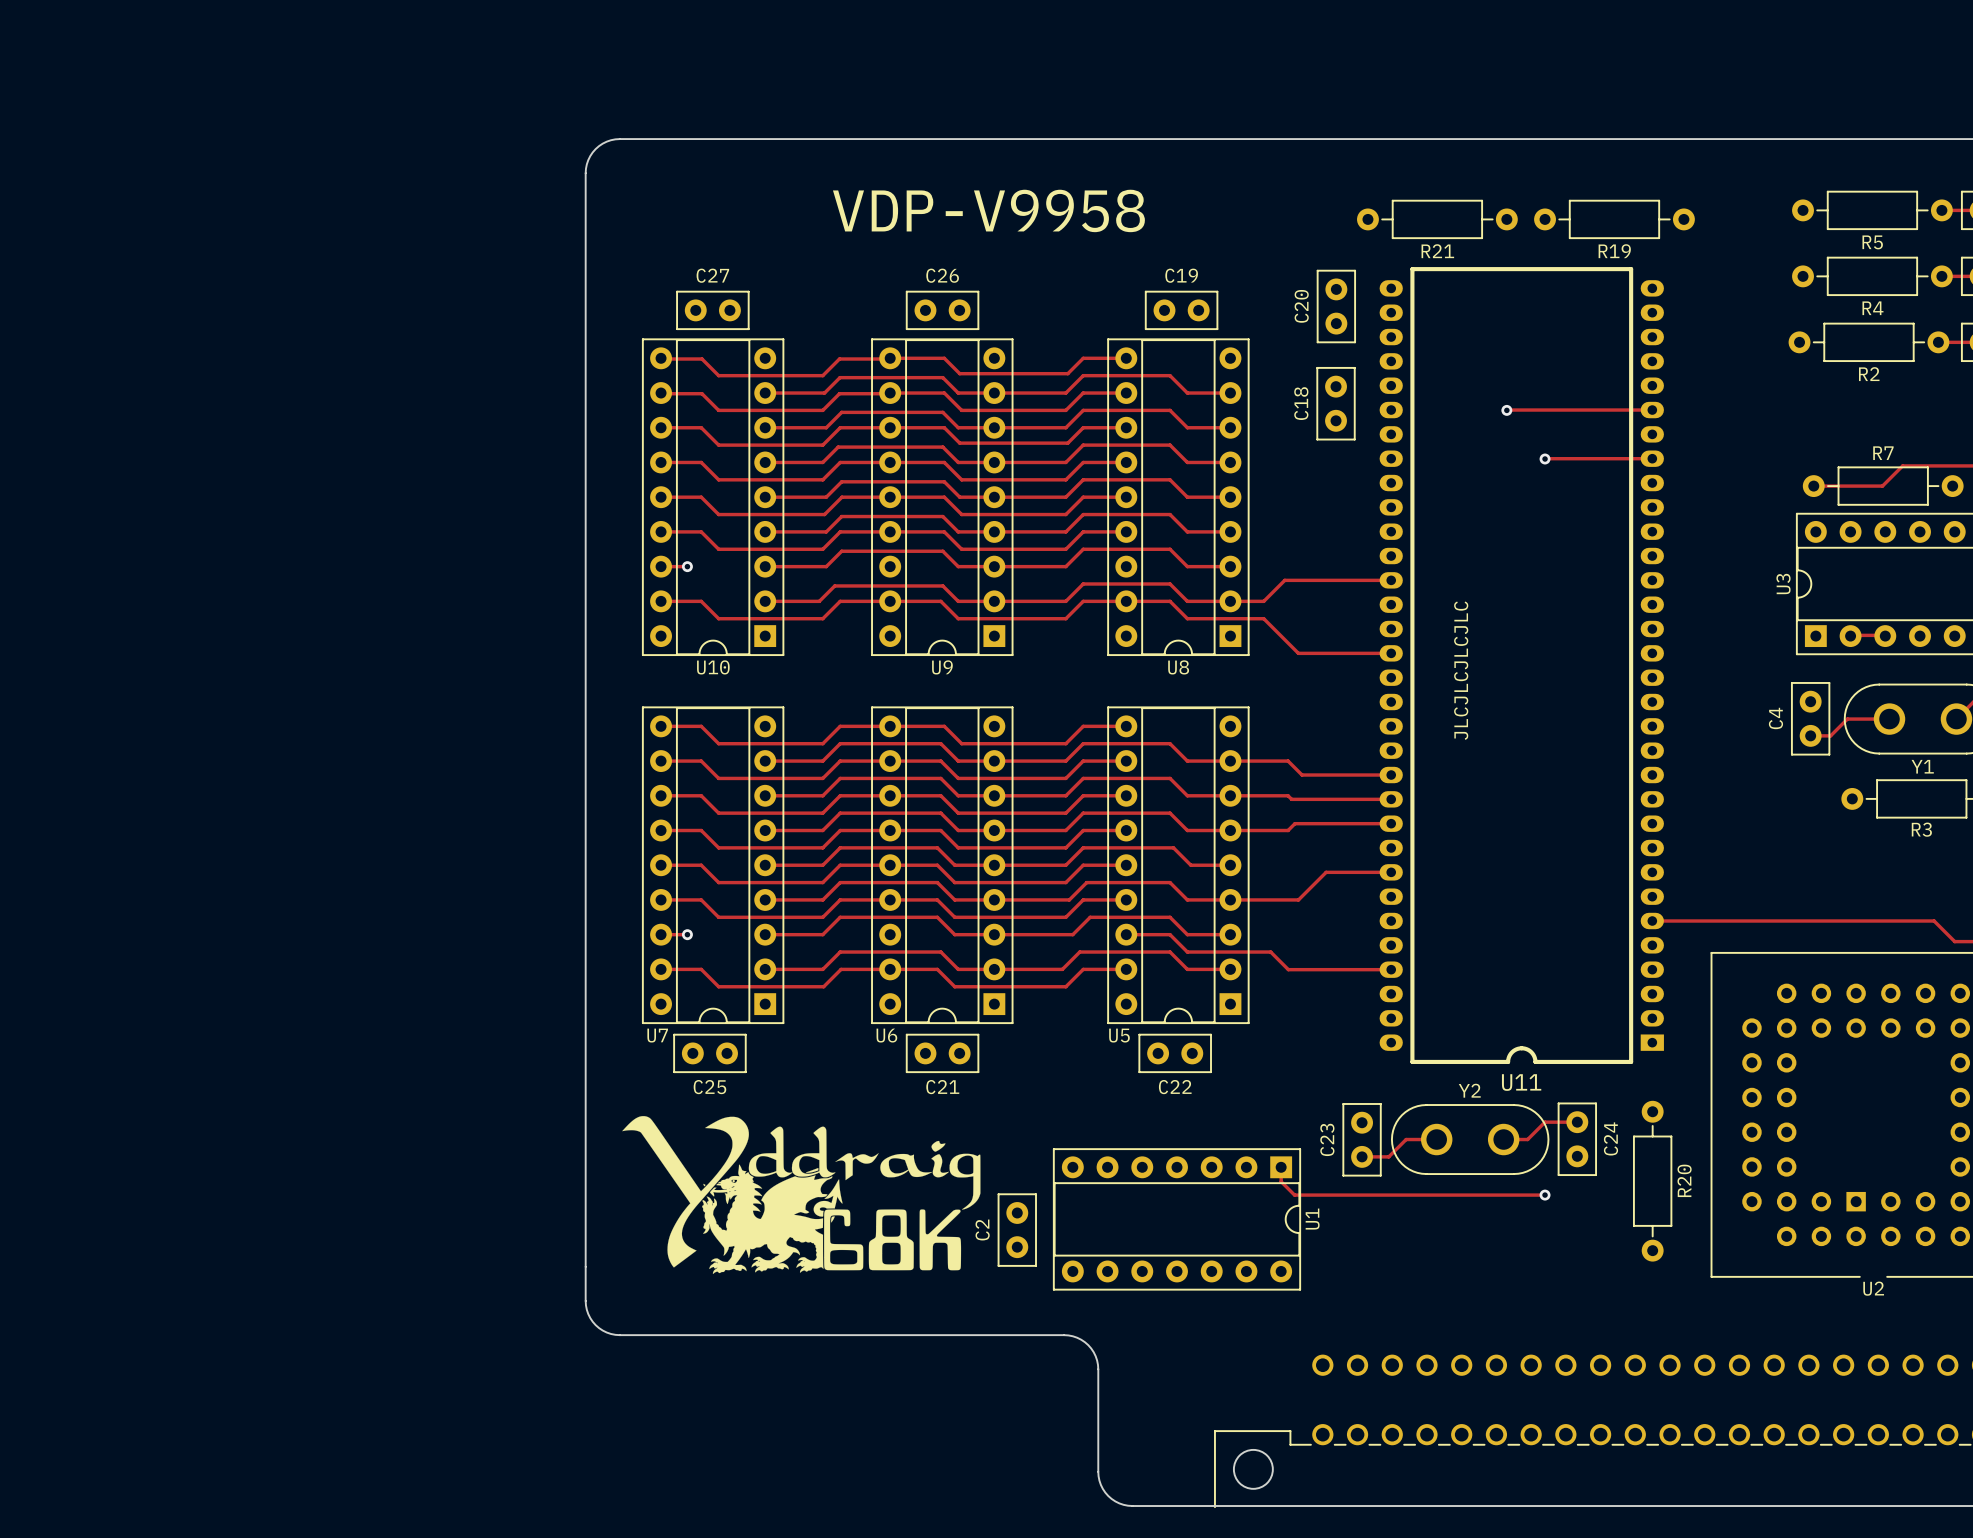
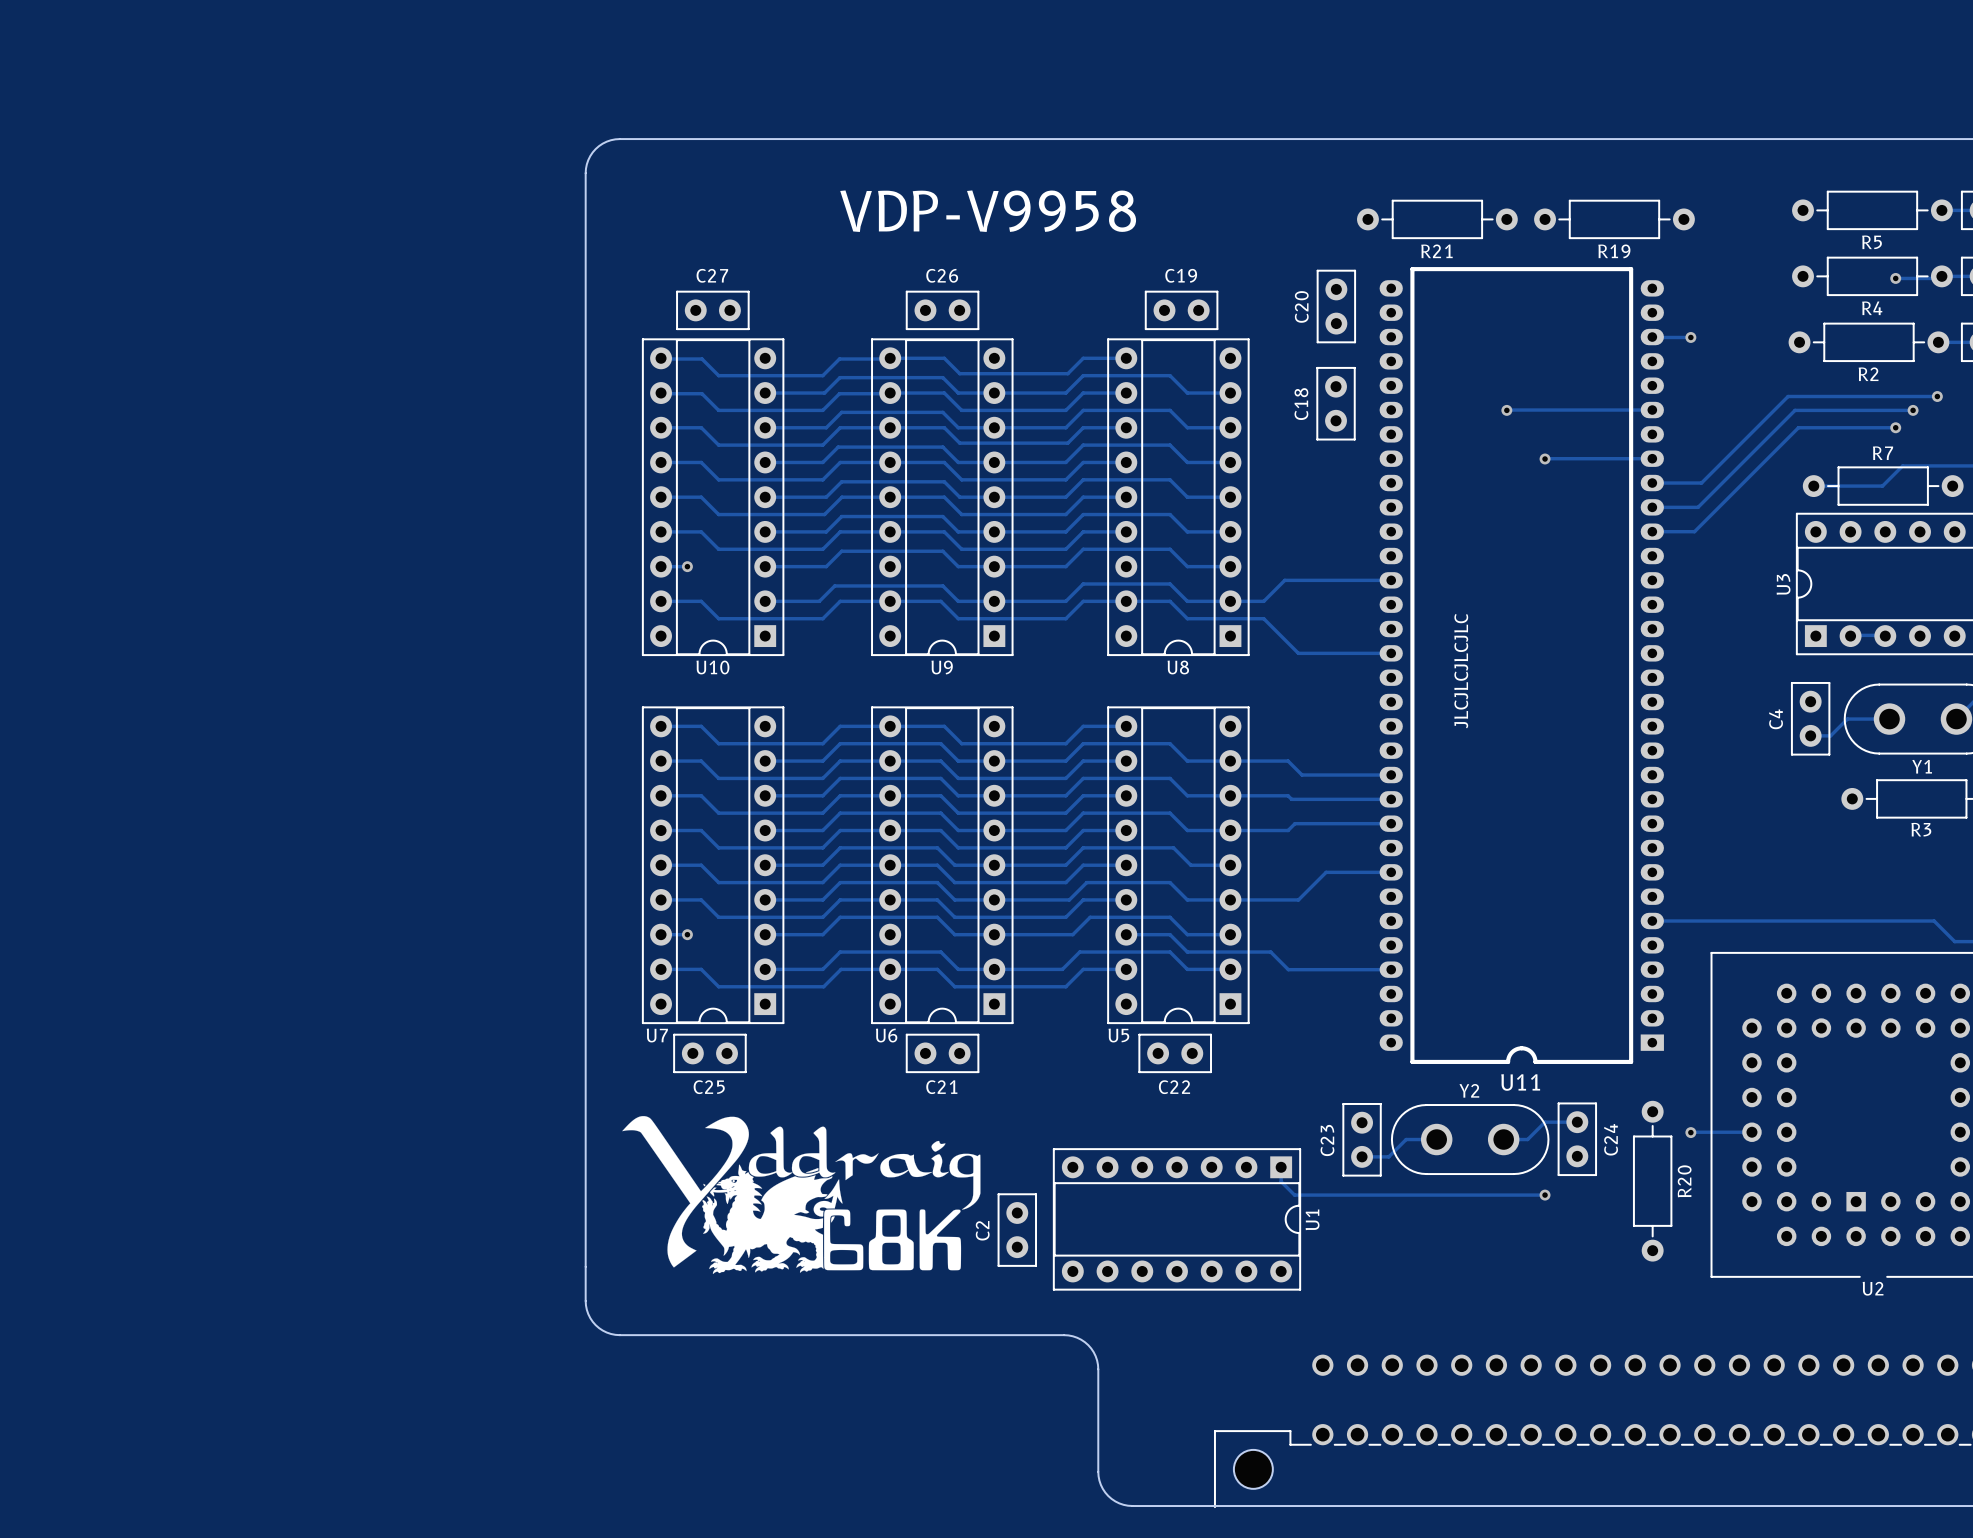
track: none -> (1895, 278) (1939, 278)
via: none -> (1895, 278)
track: none -> (1652, 337) (1690, 337)
via: none -> (1690, 337)
track: none -> (1937, 396) (1788, 396) (1701, 483) (1652, 483)
via: none -> (1937, 396)
track: none -> (1913, 410) (1795, 410) (1698, 507) (1652, 507)
via: none -> (1913, 410)
track: none -> (1895, 427) (1798, 427) (1694, 531) (1652, 531)
via: none -> (1895, 427)
via: none -> (1690, 1132)
track: none -> (1751, 1132) (1690, 1132)

